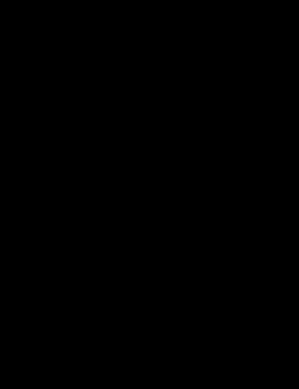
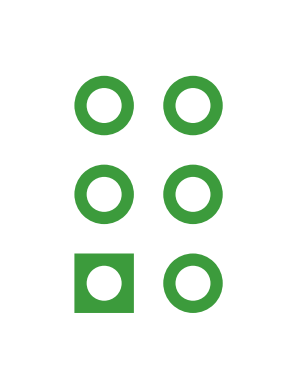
part: none -> (148, 194)

